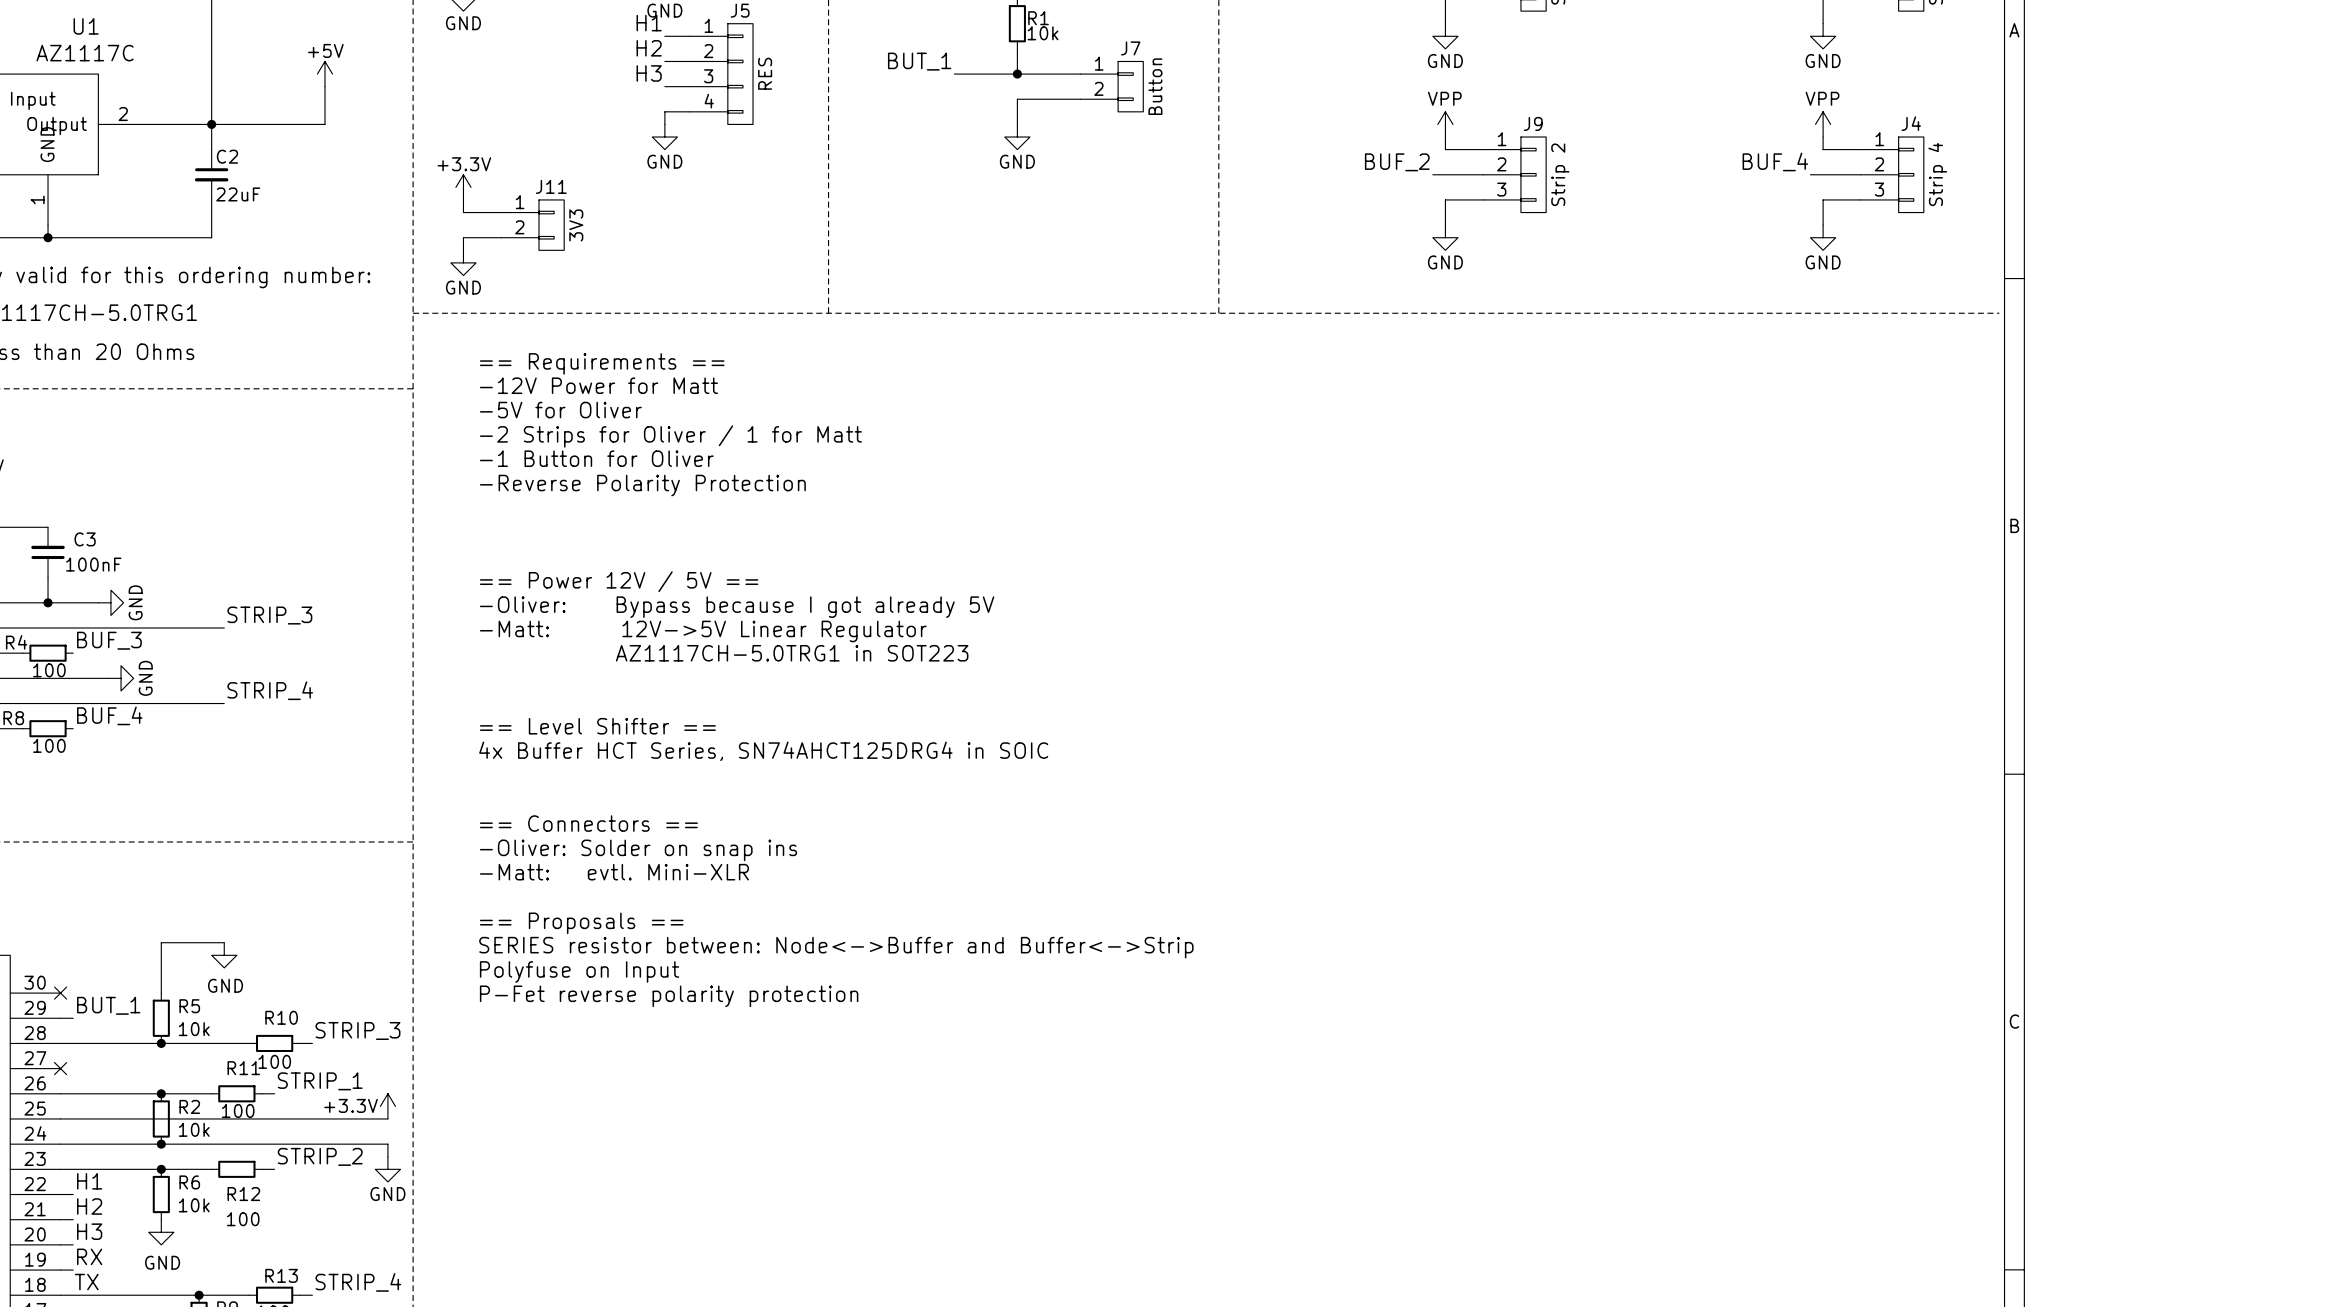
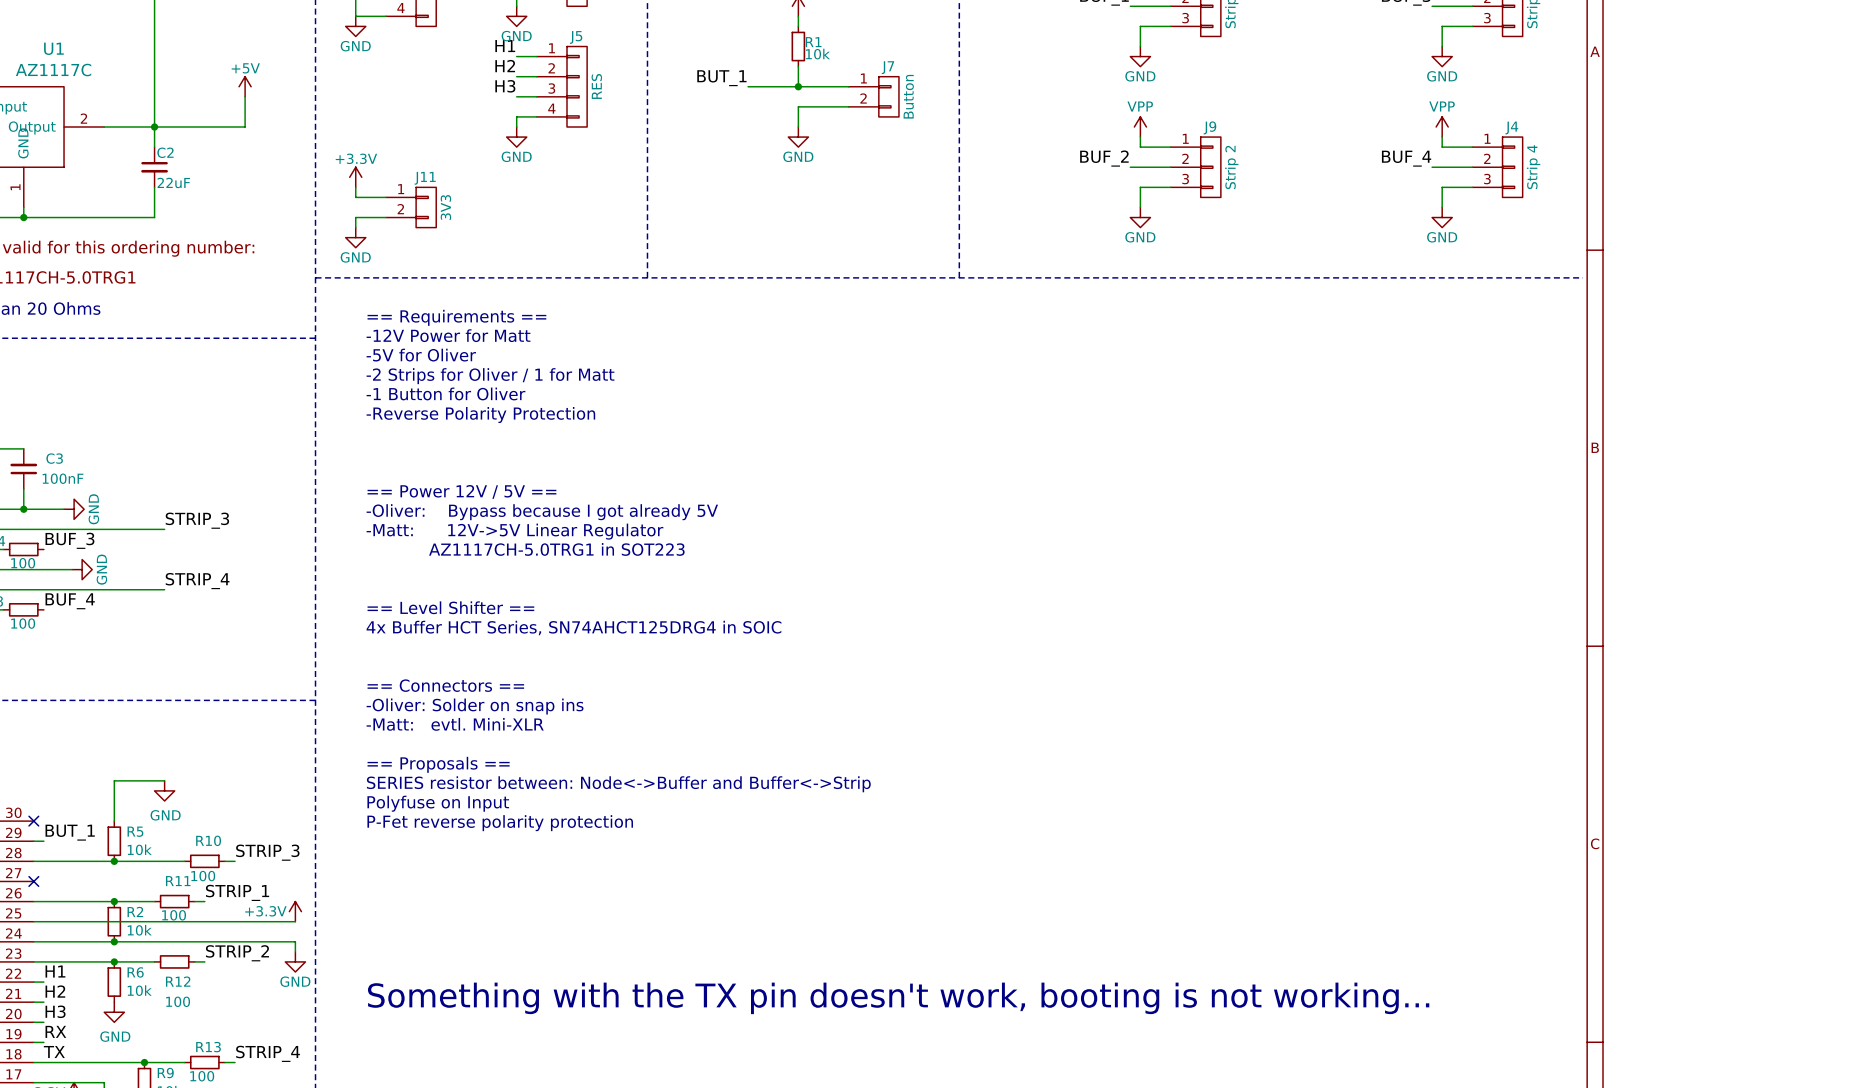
text: none -> Something with the TX pin doesn't work, booting is not working... (898, 998)

